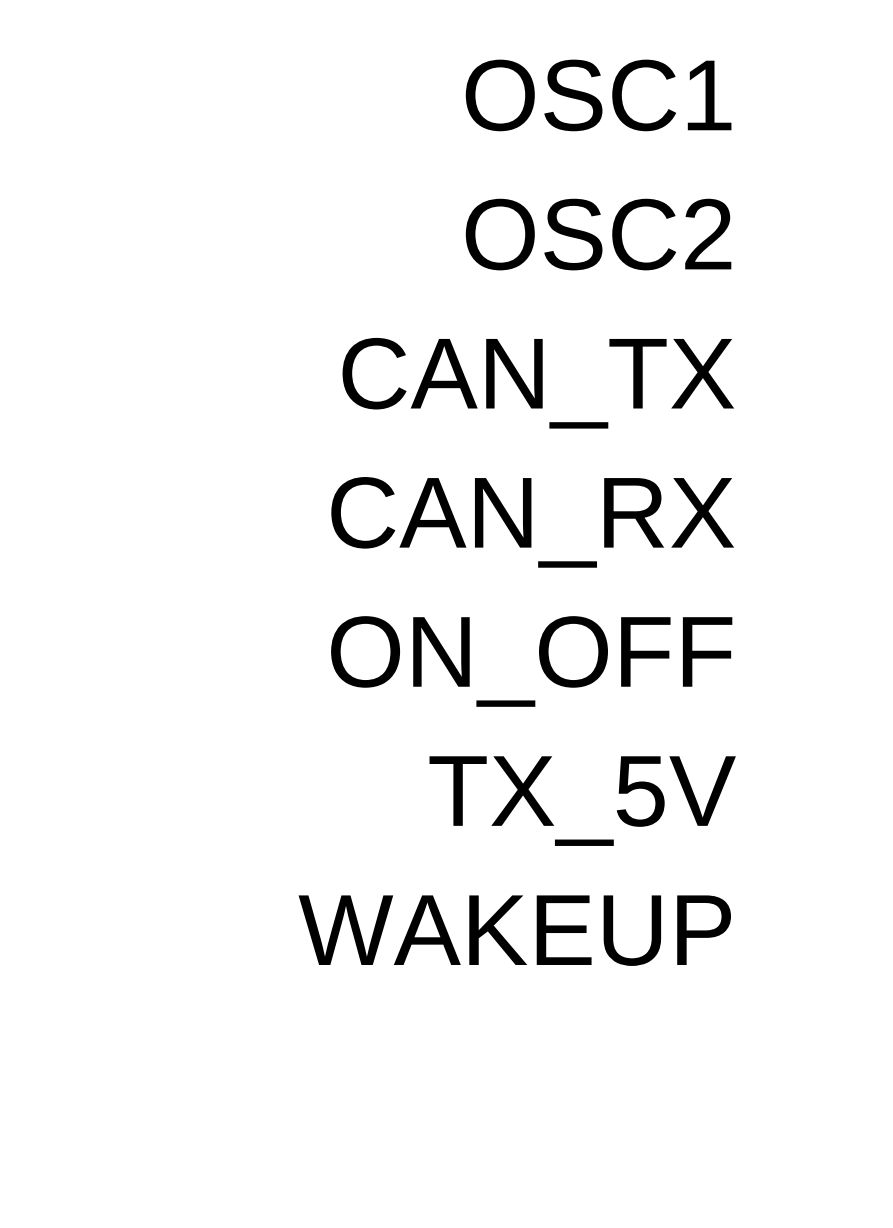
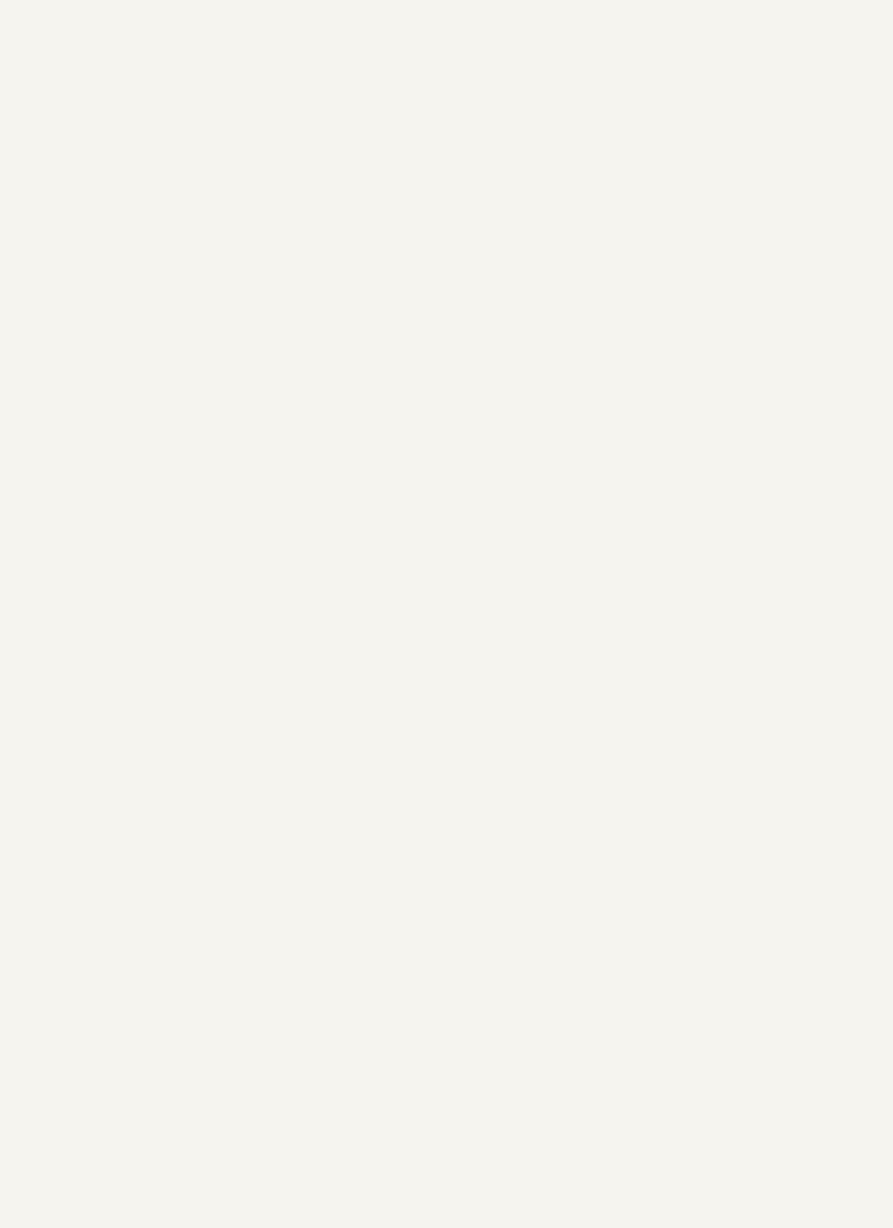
label: OSC1 (598, 95) -> none
label: OSC2 (598, 234) -> none
label: CAN_TX (538, 383) -> none
label: CAN_RX (532, 522) -> none
label: ON_OFF (531, 661) -> none
label: TX_5V (582, 801) -> none
label: WAKEUP (514, 930) -> none

